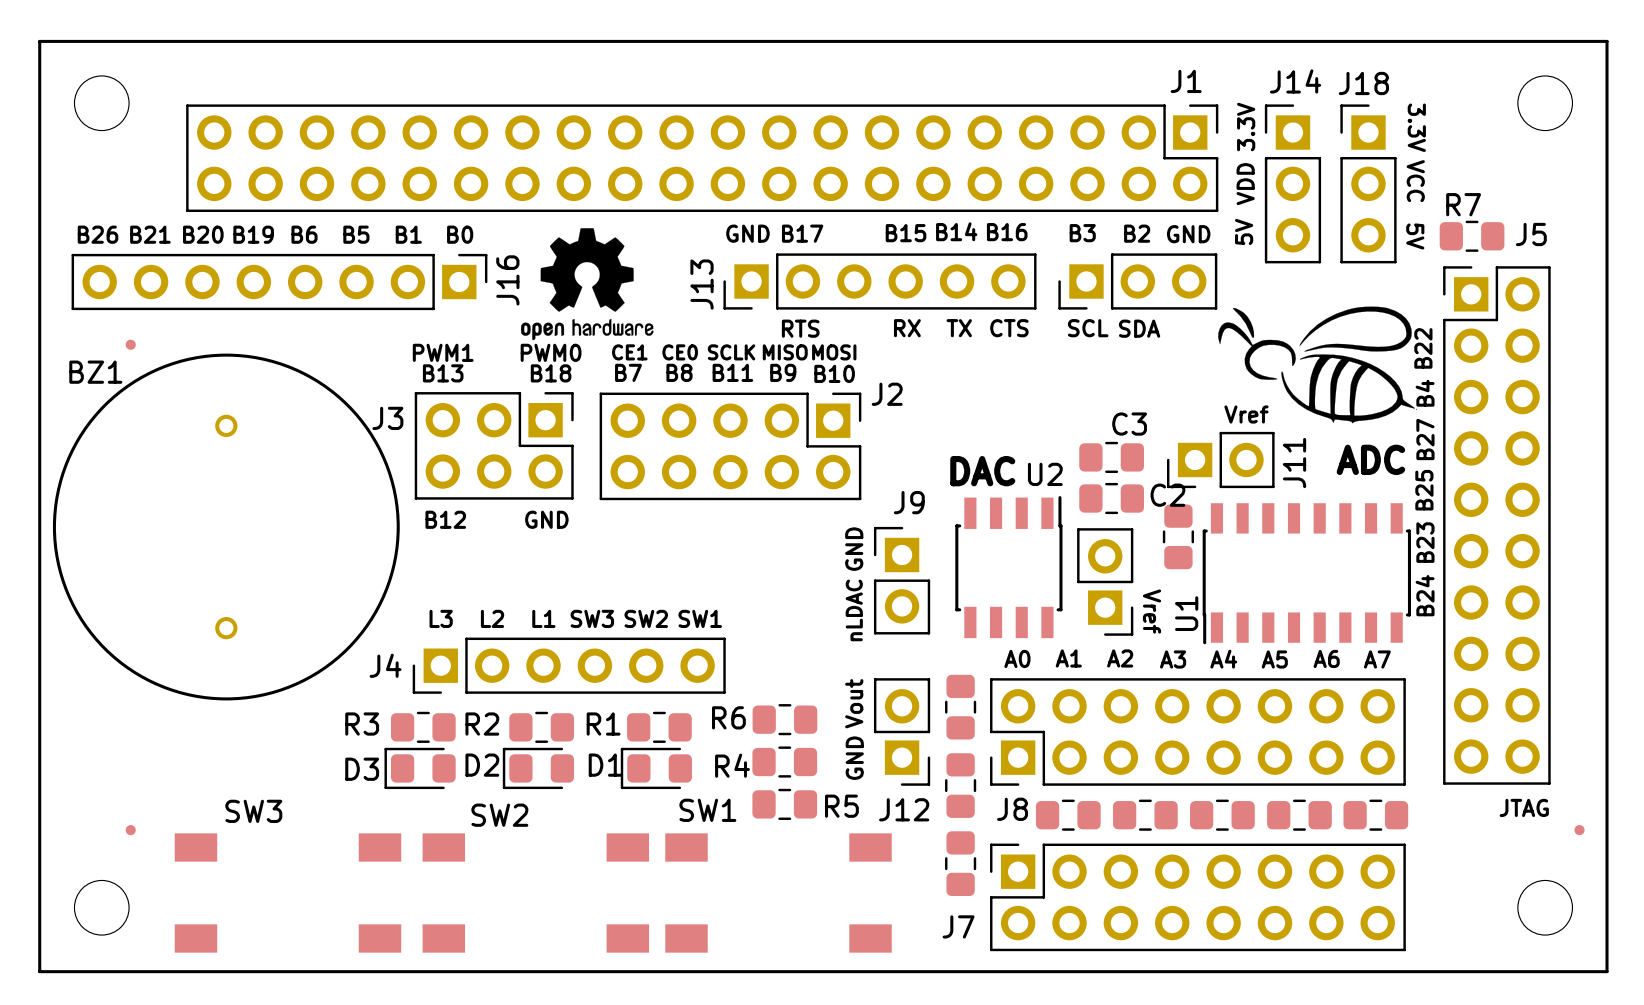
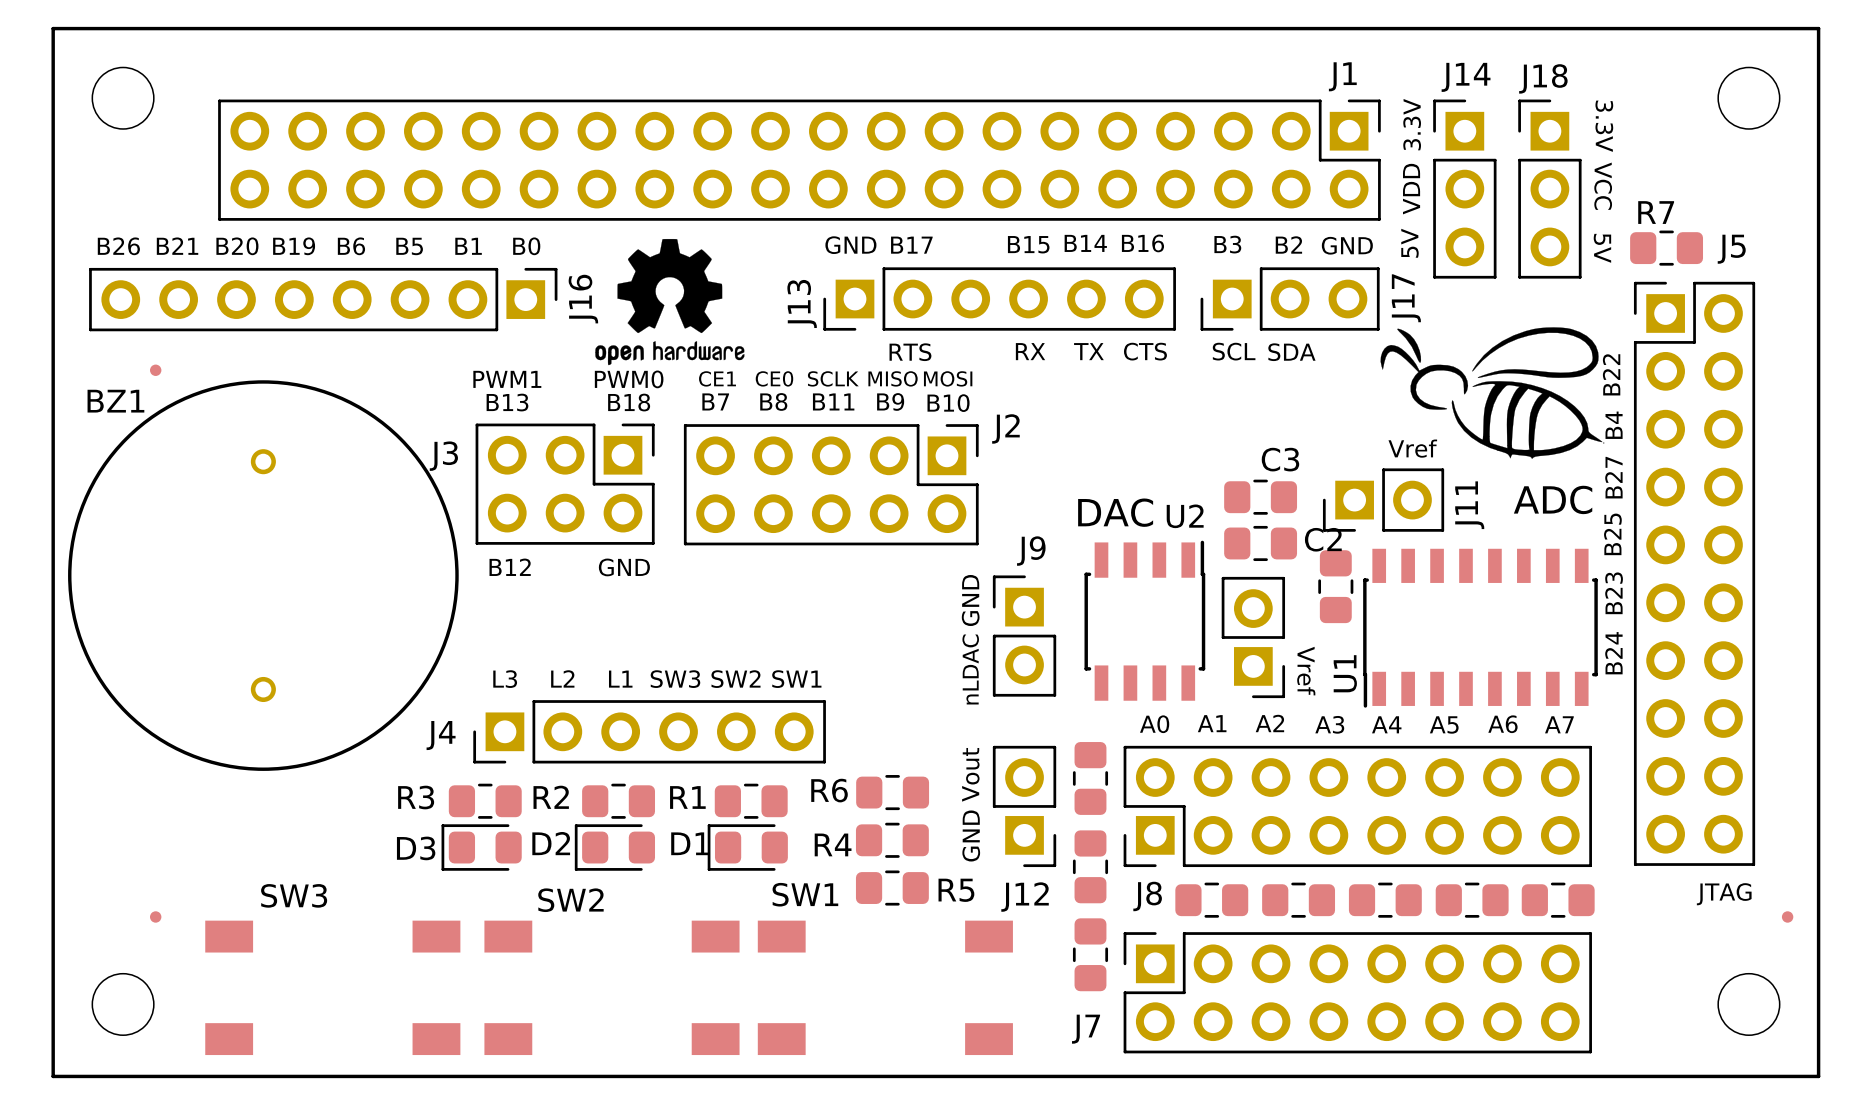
J17 name: none -> J17 (1406, 298)

